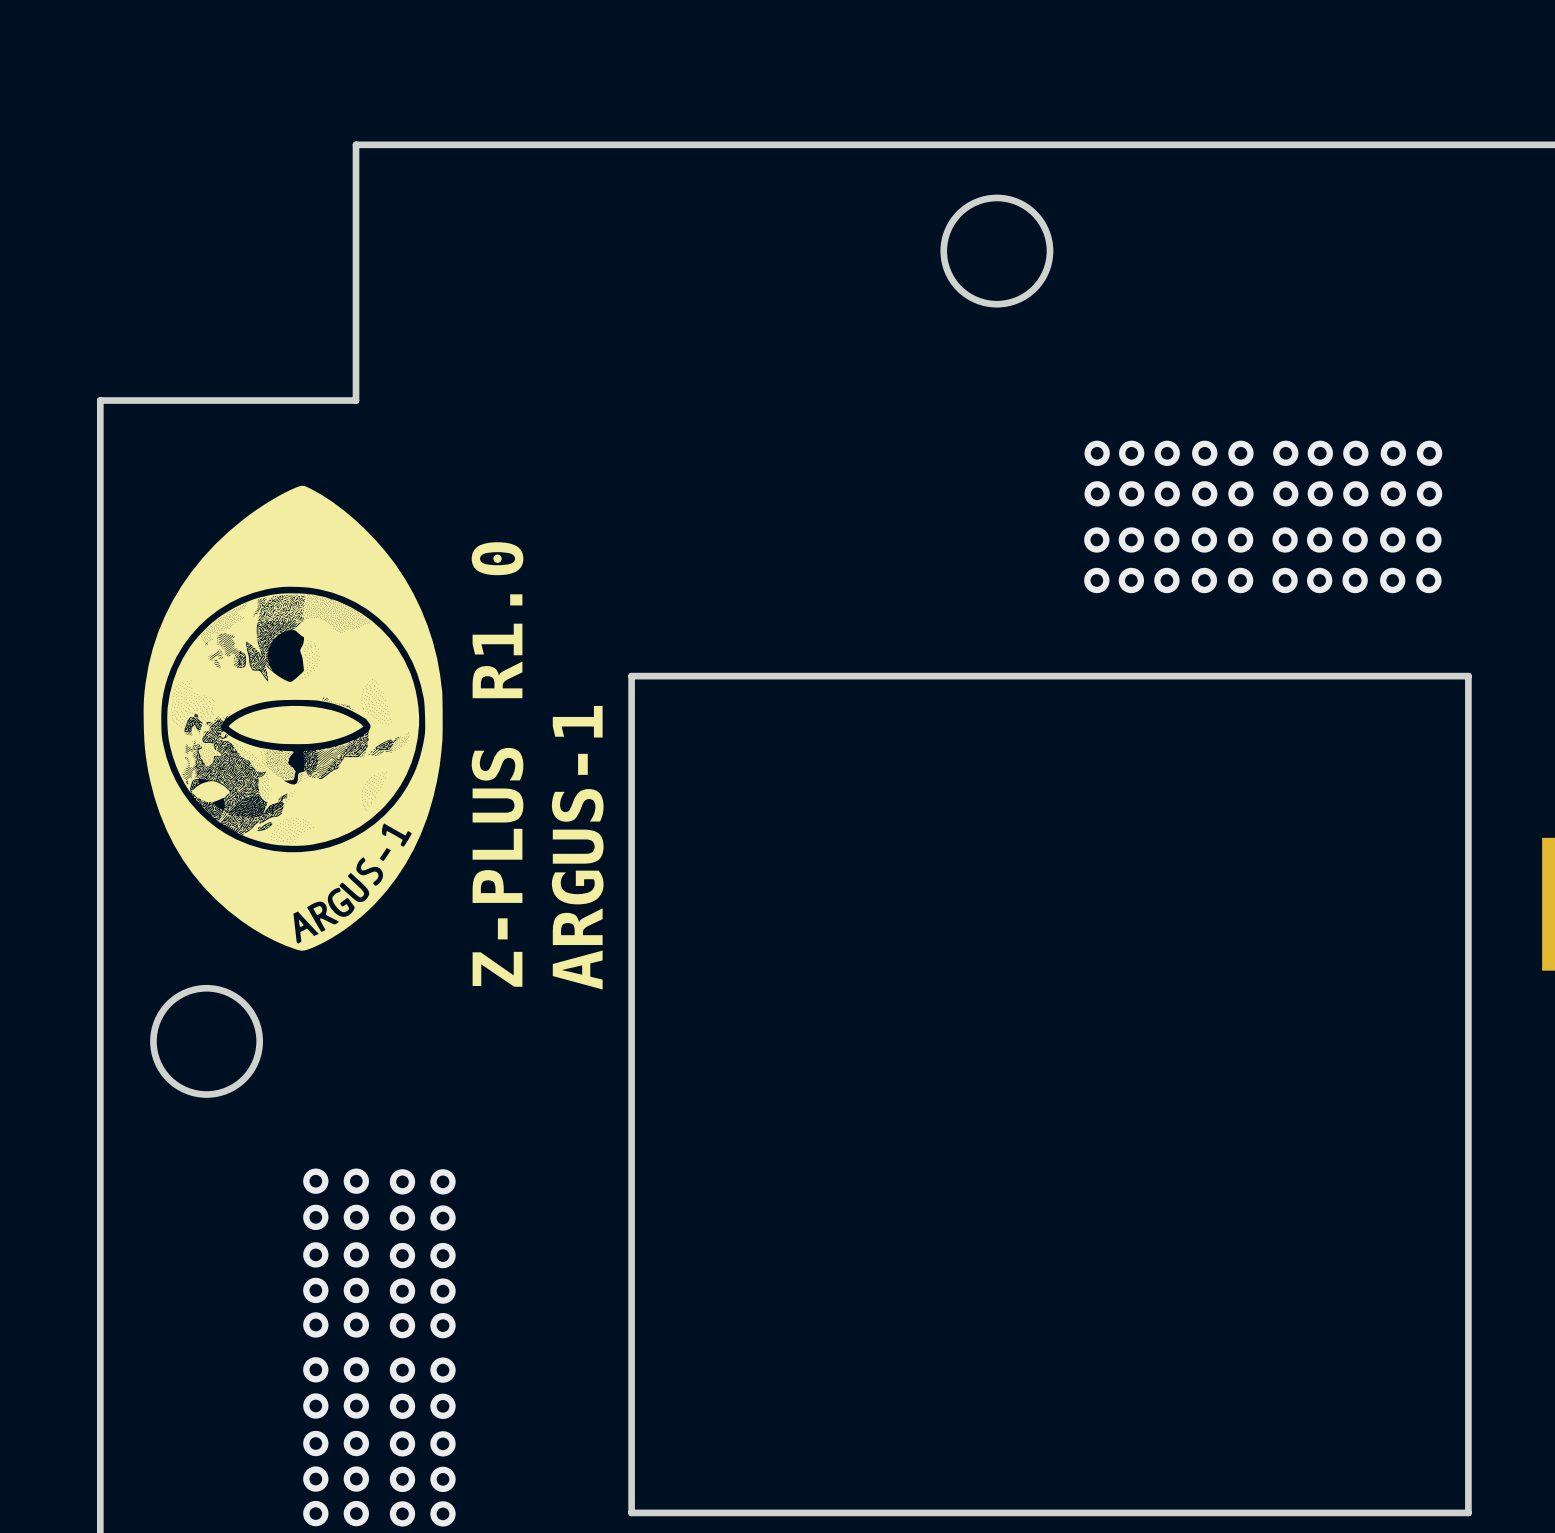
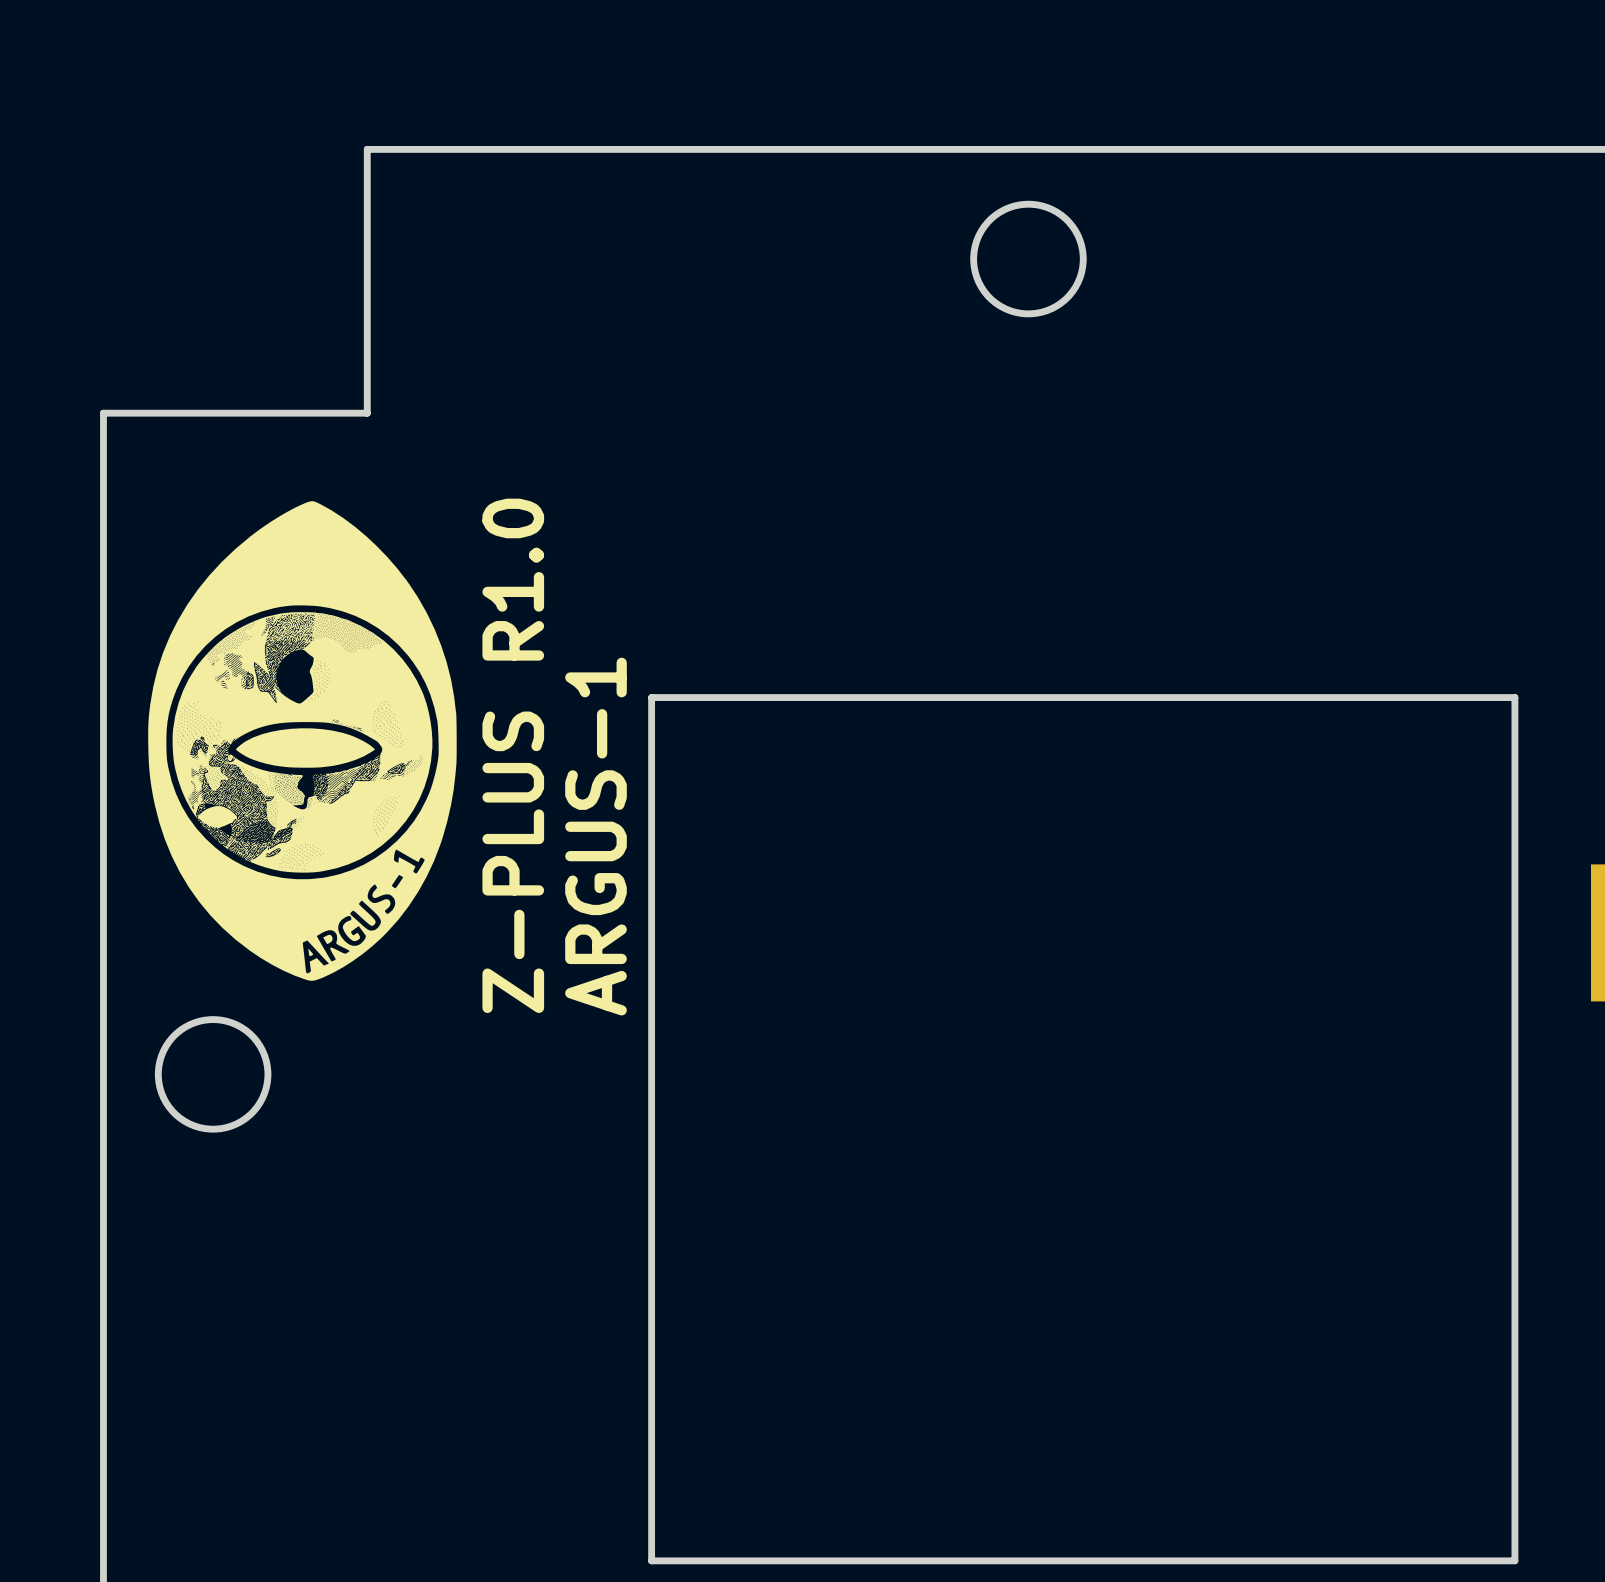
via: (1097, 453) -> none
via: (1131, 453) -> none
via: (1167, 453) -> none
via: (1204, 453) -> none
via: (1240, 453) -> none
via: (1285, 453) -> none
via: (1320, 453) -> none
via: (1355, 453) -> none
via: (1393, 453) -> none
via: (1429, 453) -> none
via: (1097, 493) -> none
via: (1131, 493) -> none
via: (1167, 493) -> none
via: (1204, 493) -> none
via: (1240, 493) -> none
via: (1285, 493) -> none
via: (1320, 493) -> none
via: (1355, 493) -> none
via: (1393, 493) -> none
via: (1429, 493) -> none
via: (1096, 539) -> none
via: (1131, 539) -> none
via: (1166, 539) -> none
via: (1204, 539) -> none
via: (1240, 539) -> none
via: (1285, 539) -> none
via: (1319, 539) -> none
via: (1355, 539) -> none
via: (1392, 539) -> none
via: (1428, 539) -> none
via: (1096, 580) -> none
via: (1131, 580) -> none
via: (1166, 580) -> none
via: (1204, 580) -> none
via: (1240, 580) -> none
via: (1285, 580) -> none
via: (1319, 580) -> none
via: (1355, 580) -> none
via: (1392, 580) -> none
via: (1428, 580) -> none
via: (315, 1181) -> none
via: (356, 1181) -> none
via: (402, 1181) -> none
via: (443, 1181) -> none
via: (315, 1217) -> none
via: (356, 1217) -> none
via: (402, 1218) -> none
via: (443, 1218) -> none
via: (315, 1254) -> none
via: (356, 1254) -> none
via: (402, 1255) -> none
via: (443, 1255) -> none
via: (315, 1290) -> none
via: (356, 1290) -> none
via: (402, 1291) -> none
via: (443, 1291) -> none
via: (315, 1324) -> none
via: (356, 1324) -> none
via: (402, 1325) -> none
via: (443, 1325) -> none
via: (315, 1369) -> none
via: (356, 1369) -> none
via: (402, 1370) -> none
via: (443, 1370) -> none
via: (315, 1405) -> none
via: (356, 1405) -> none
via: (402, 1406) -> none
via: (443, 1406) -> none
via: (315, 1443) -> none
via: (356, 1443) -> none
via: (402, 1443) -> none
via: (443, 1443) -> none
via: (315, 1479) -> none
via: (356, 1479) -> none
via: (402, 1479) -> none
via: (443, 1479) -> none
via: (315, 1513) -> none
via: (356, 1513) -> none
via: (402, 1513) -> none
via: (443, 1513) -> none

